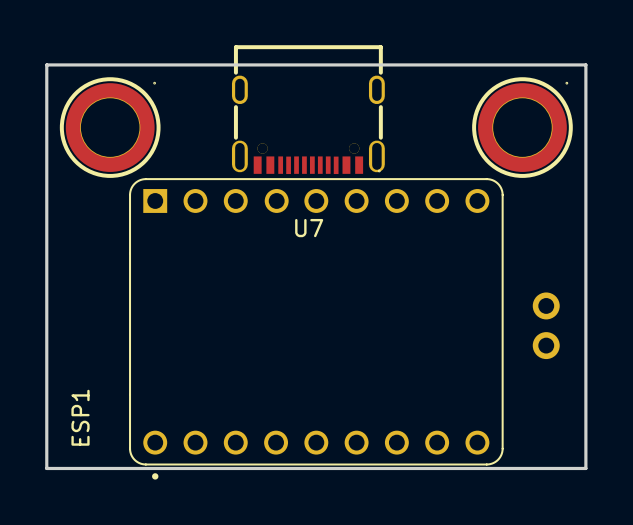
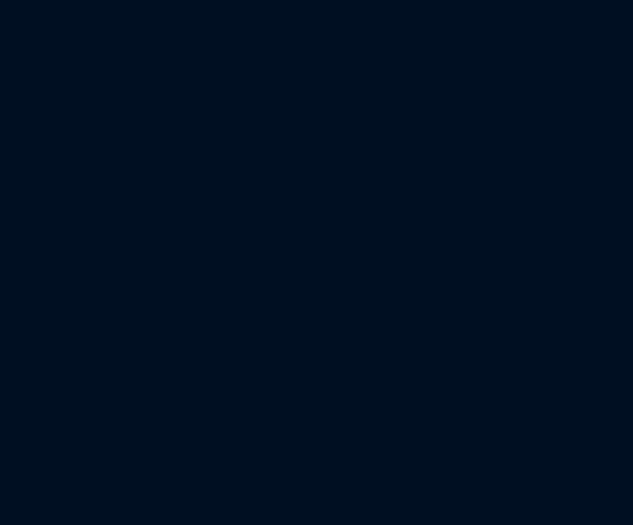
board edge: (46, 64) (585, 64) (585, 468) (46, 468) (46, 64) -> none
U7: (308, 109) -> none
part: (110, 127) -> none
part: (522, 127) -> none
part: (546, 325) -> none
ESP1: (316, 328) -> none

